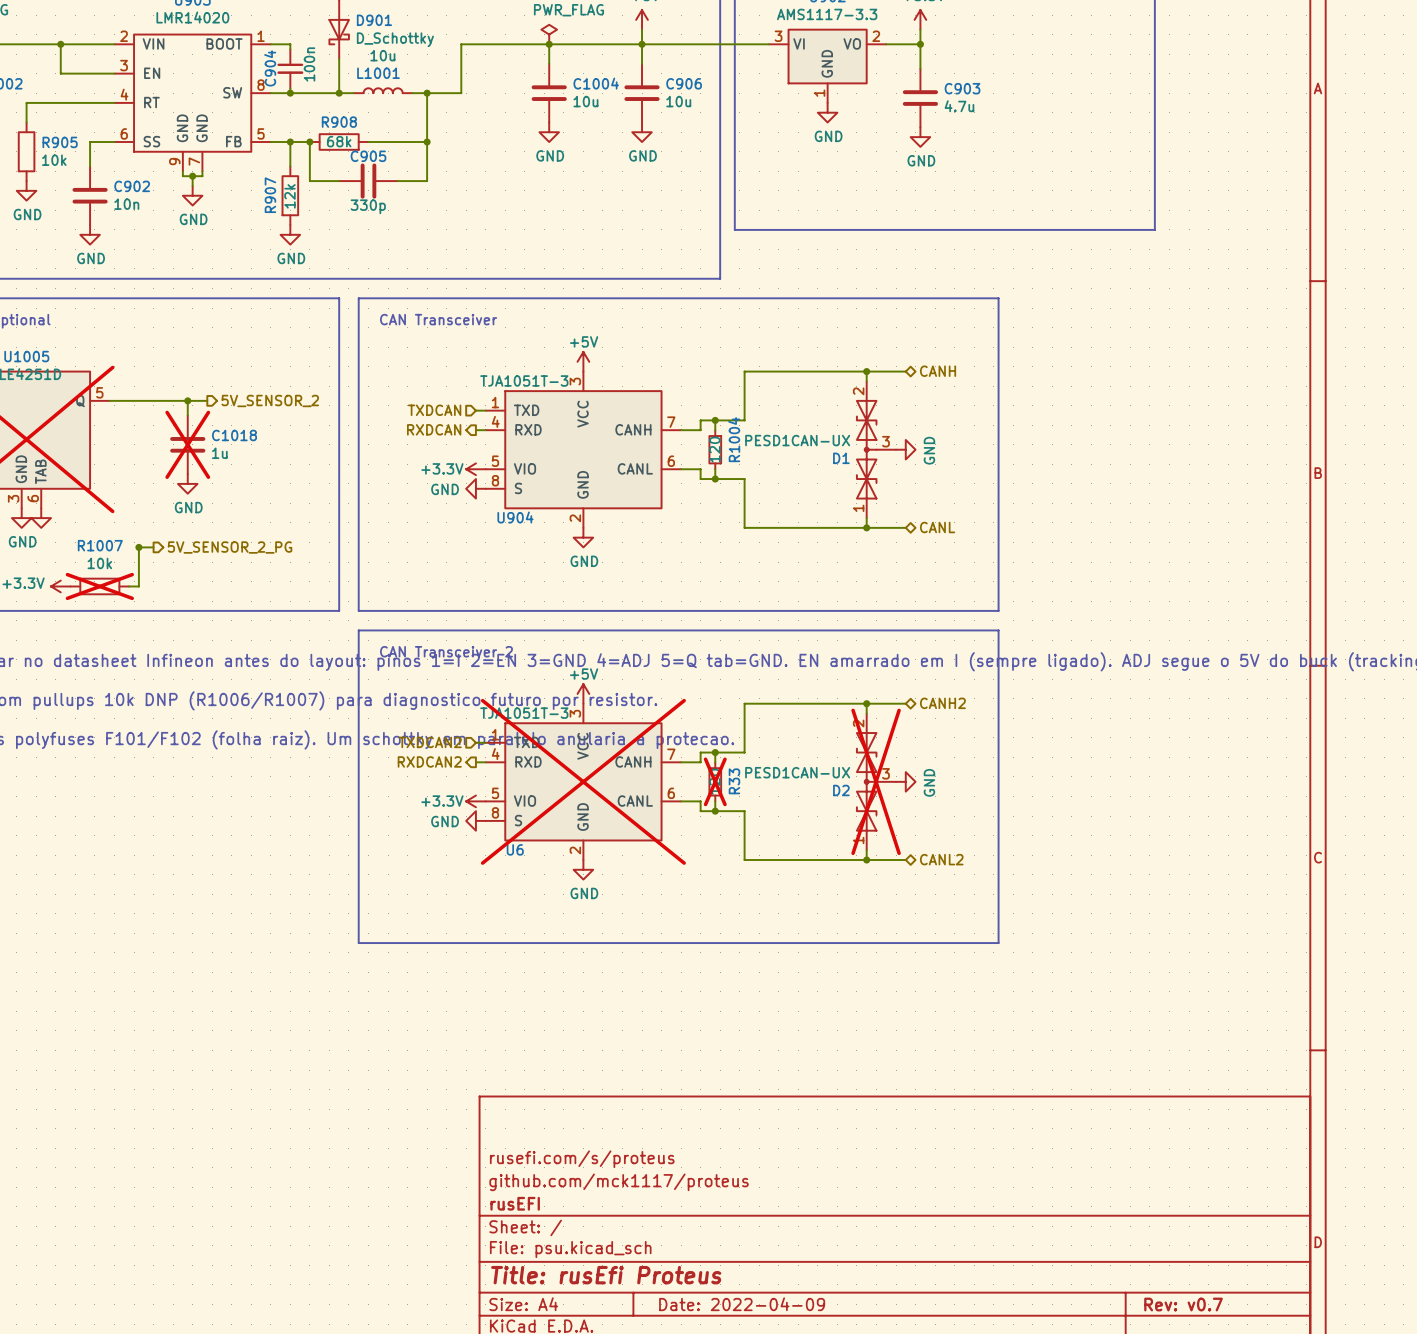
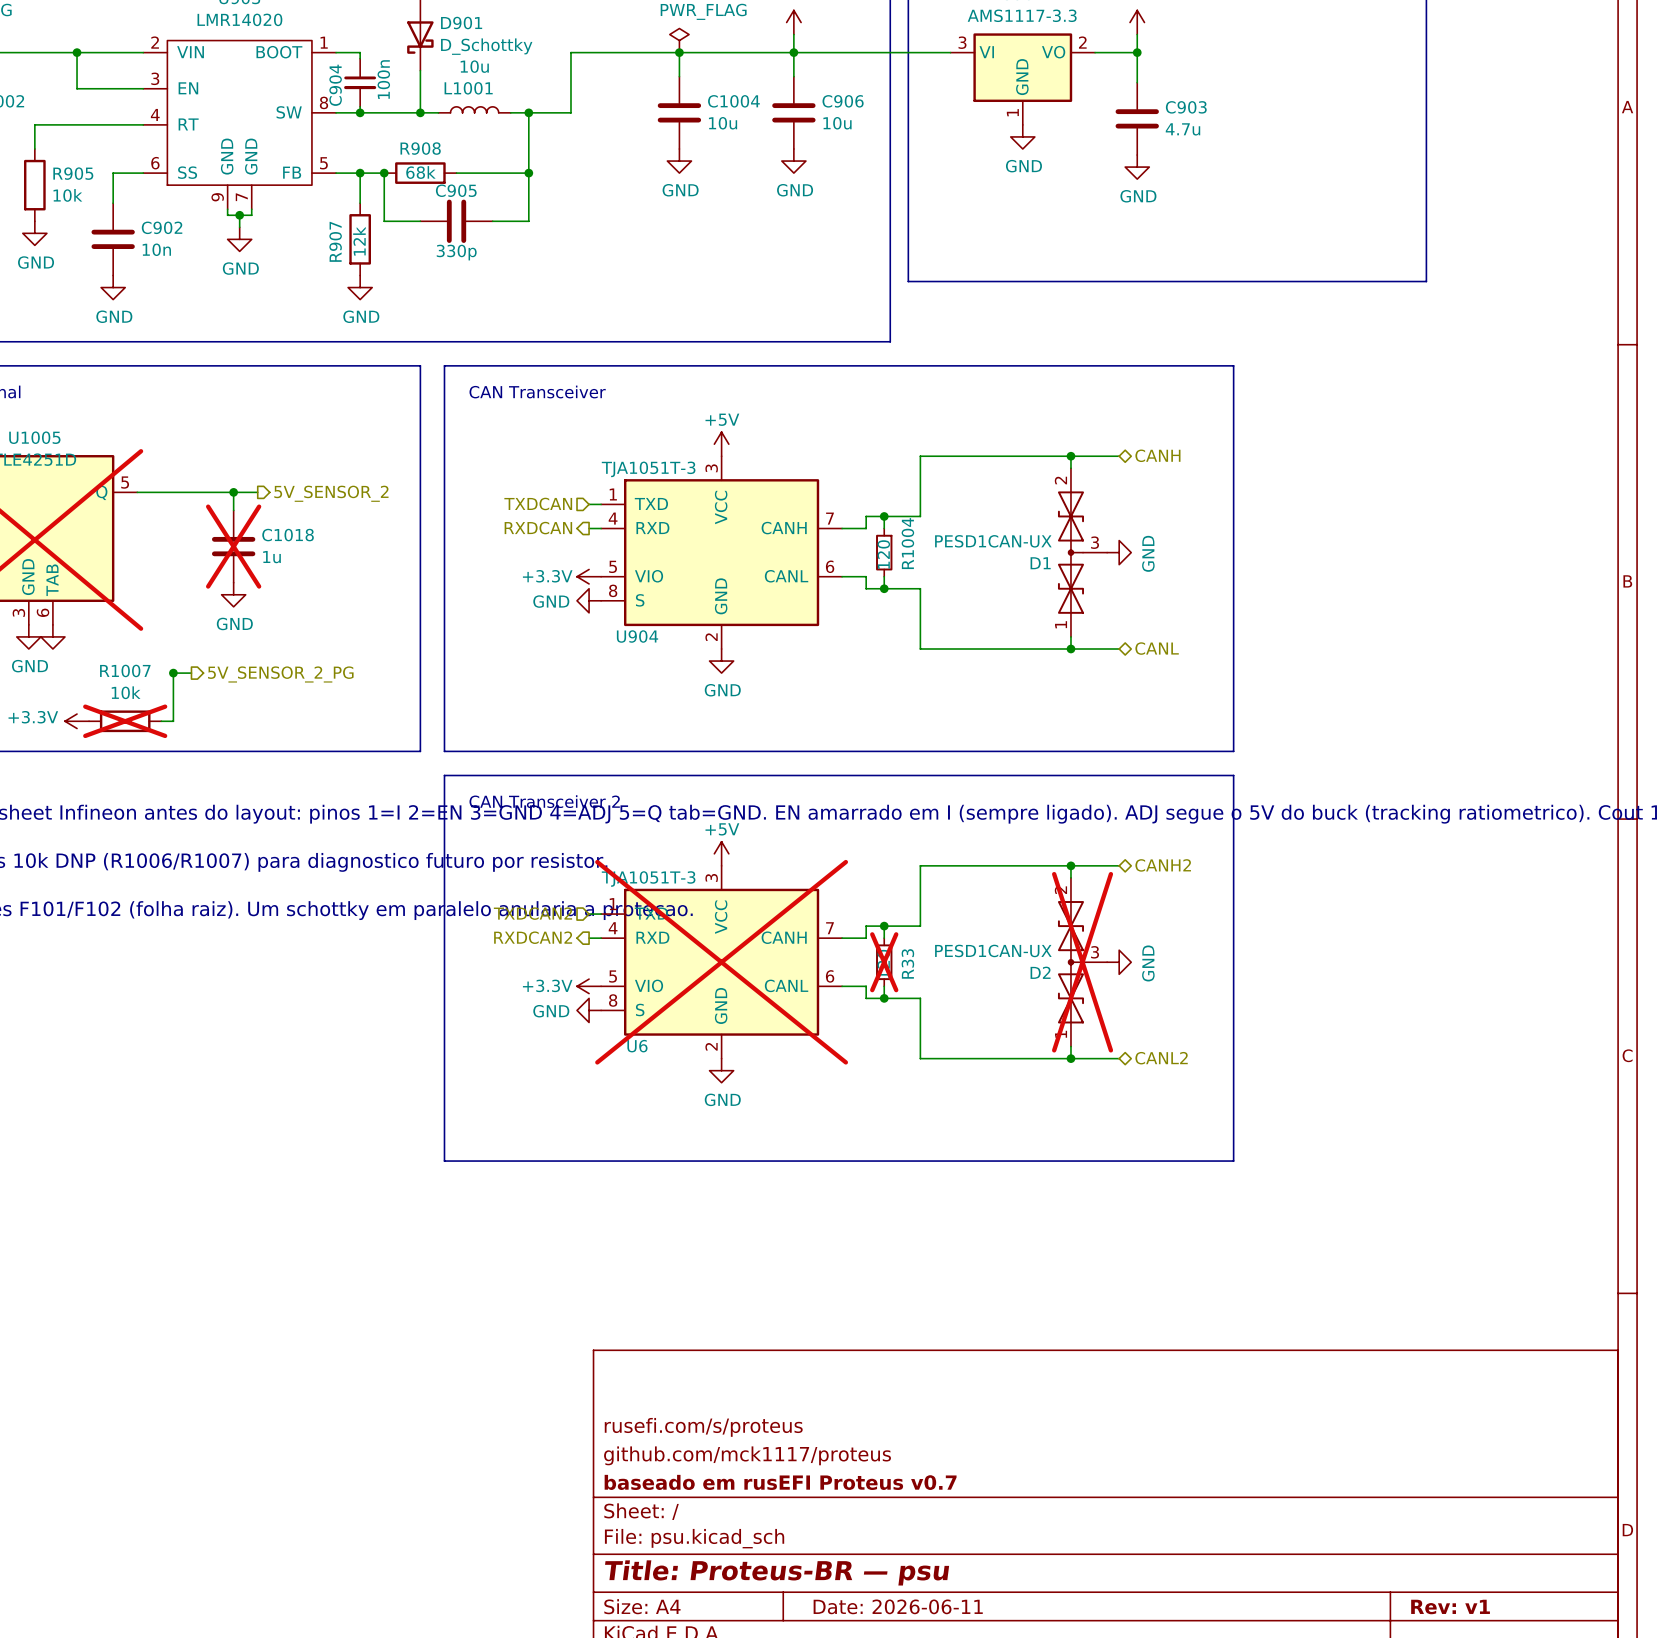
title block: rusEFI (515, 1203) -> baseado em rusEFI Proteus v0.7 (780, 1482)
title block: Title: rusEfi Proteus (606, 1275) -> Title: Proteus-BR — psu (777, 1572)
title block: Date: 2022-04-09 (742, 1304) -> Date: 2026-06-11 (898, 1606)
title block: Rev: v0.7 (1183, 1304) -> Rev: v1 (1450, 1606)

